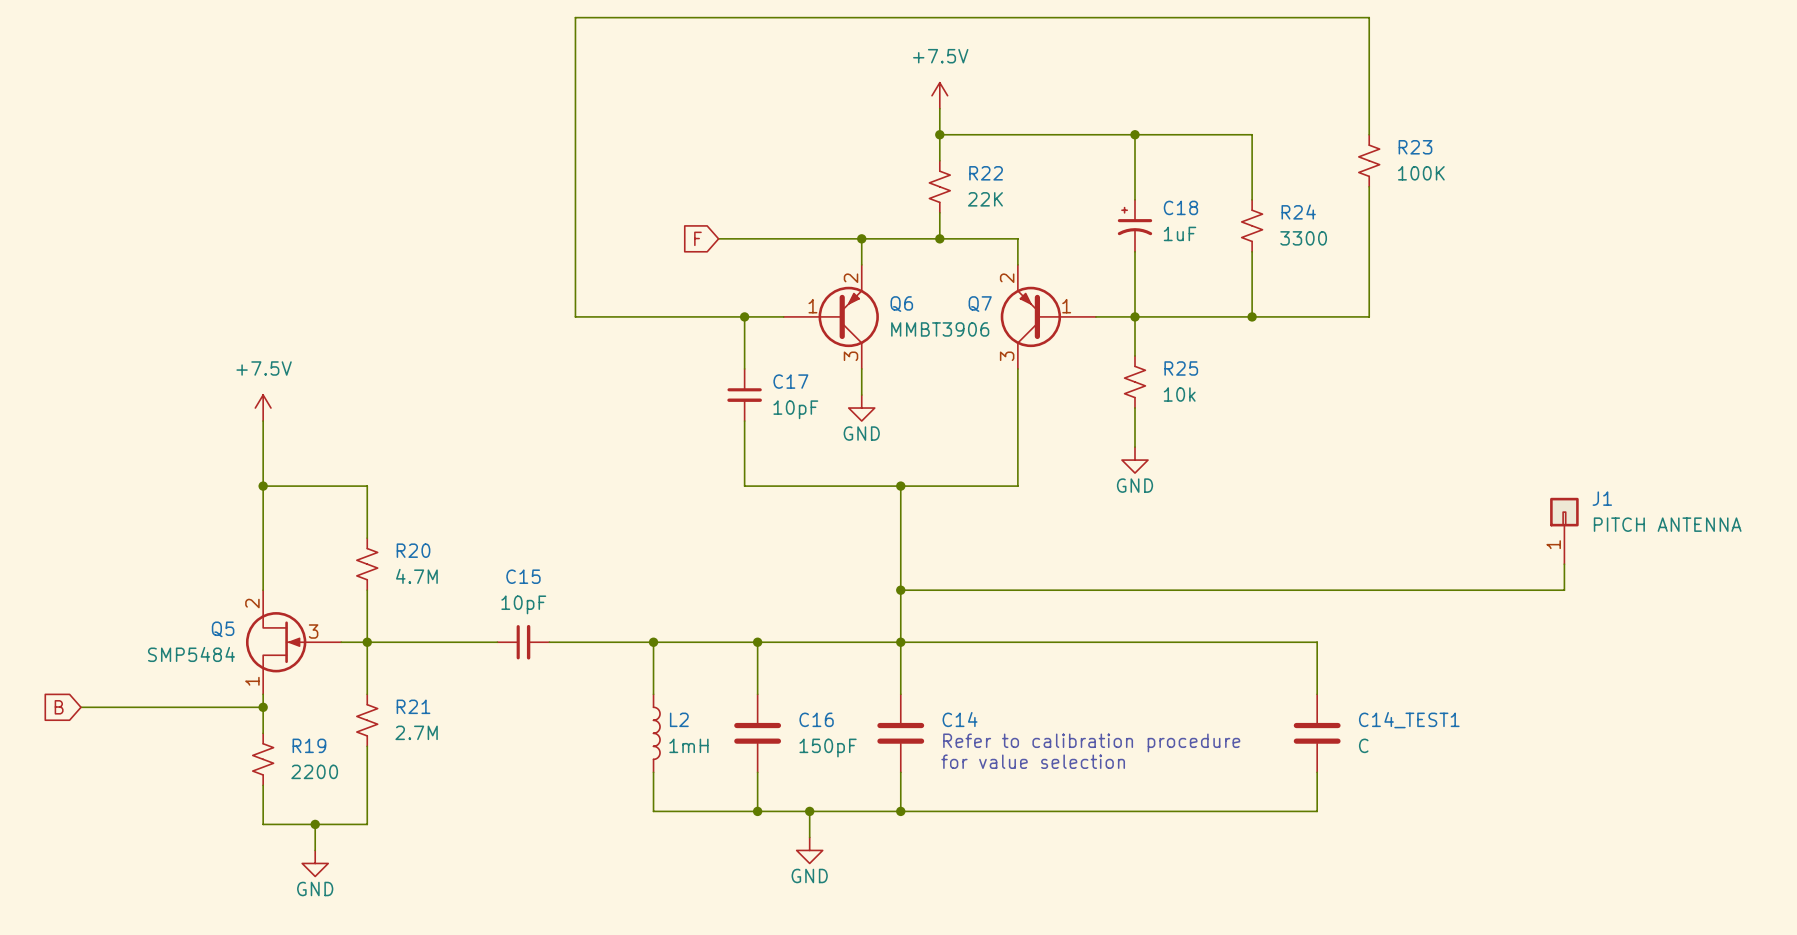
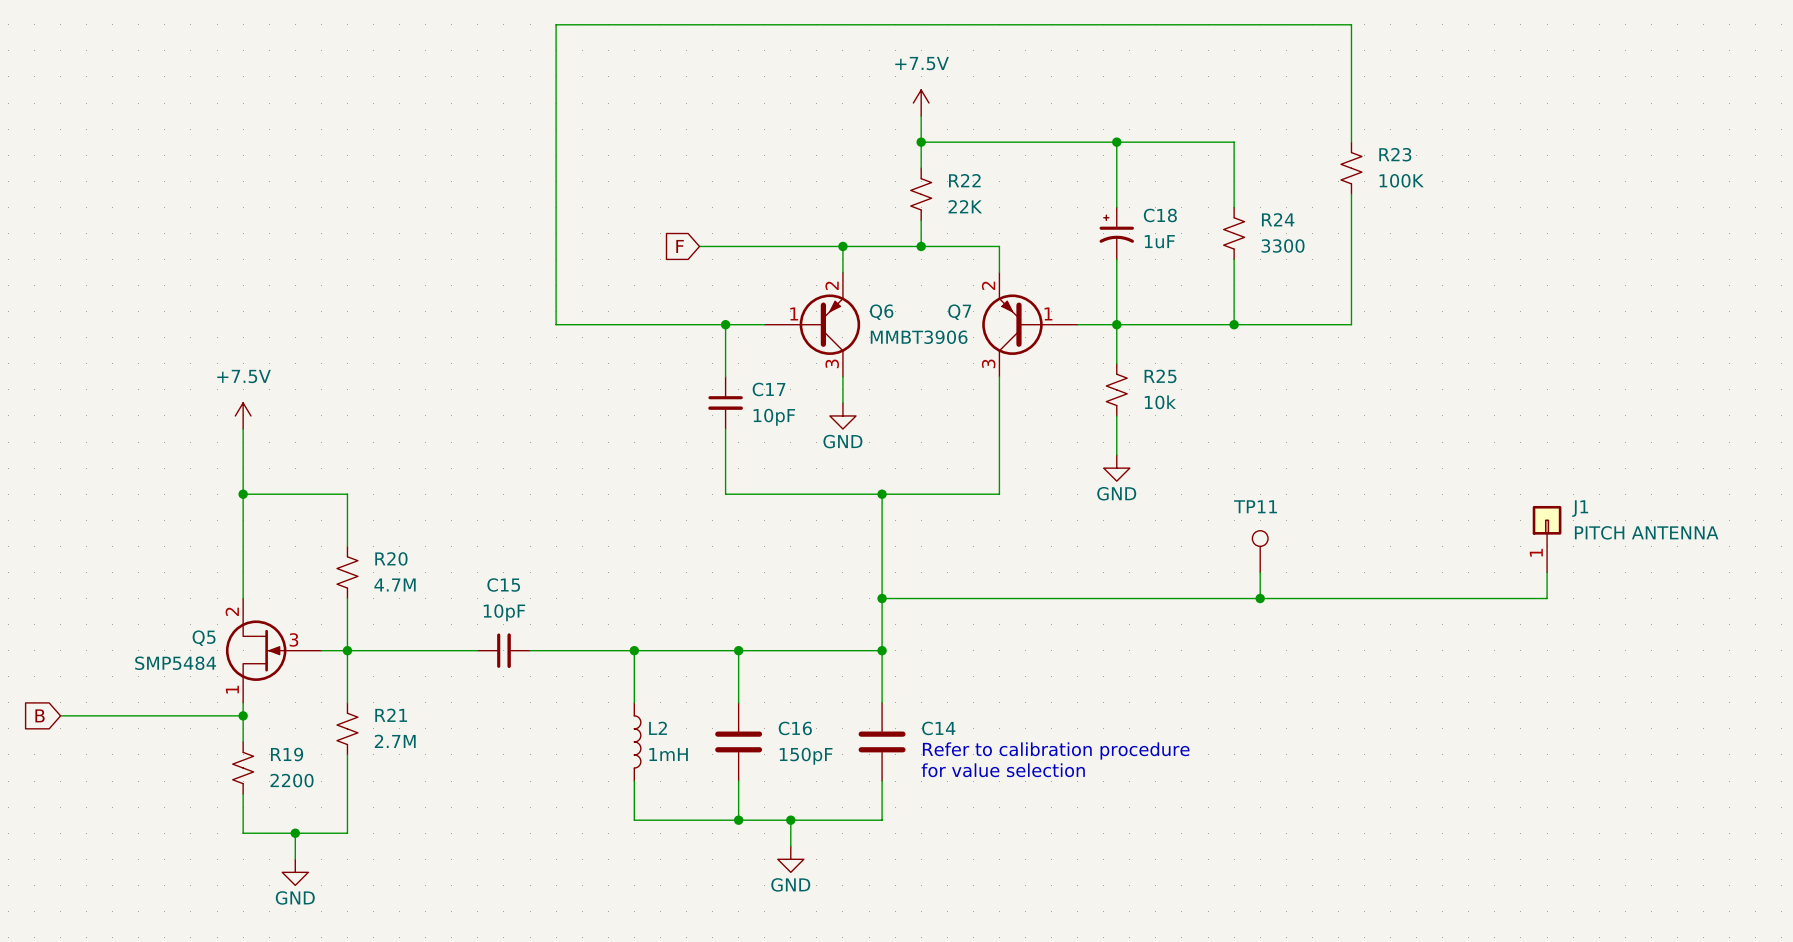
TP11: none -> (1260, 551)
wire: none -> (1260, 572) (1260, 598)
junction: none -> (1260, 598)
wire: (900, 642) (1317, 642) (1317, 694) -> none
C14_TEST1: C (1317, 733) -> none
wire: (1317, 772) (1317, 811) (900, 811) -> none
junction: (900, 811) -> none

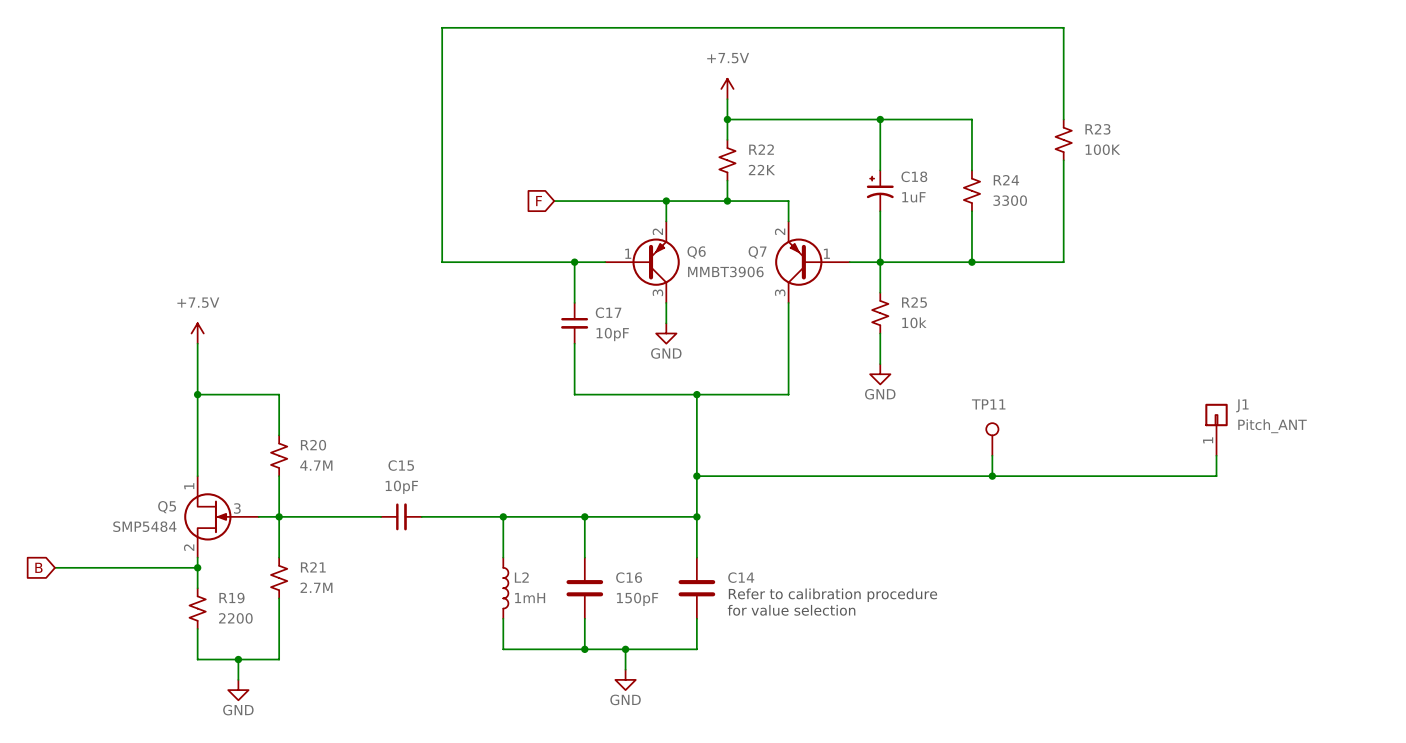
J1 value: PITCH ANTENNA (1646, 532) -> Pitch_ANT (1272, 426)
Q5 flip: as is (256, 650) -> up-down (207, 516)

